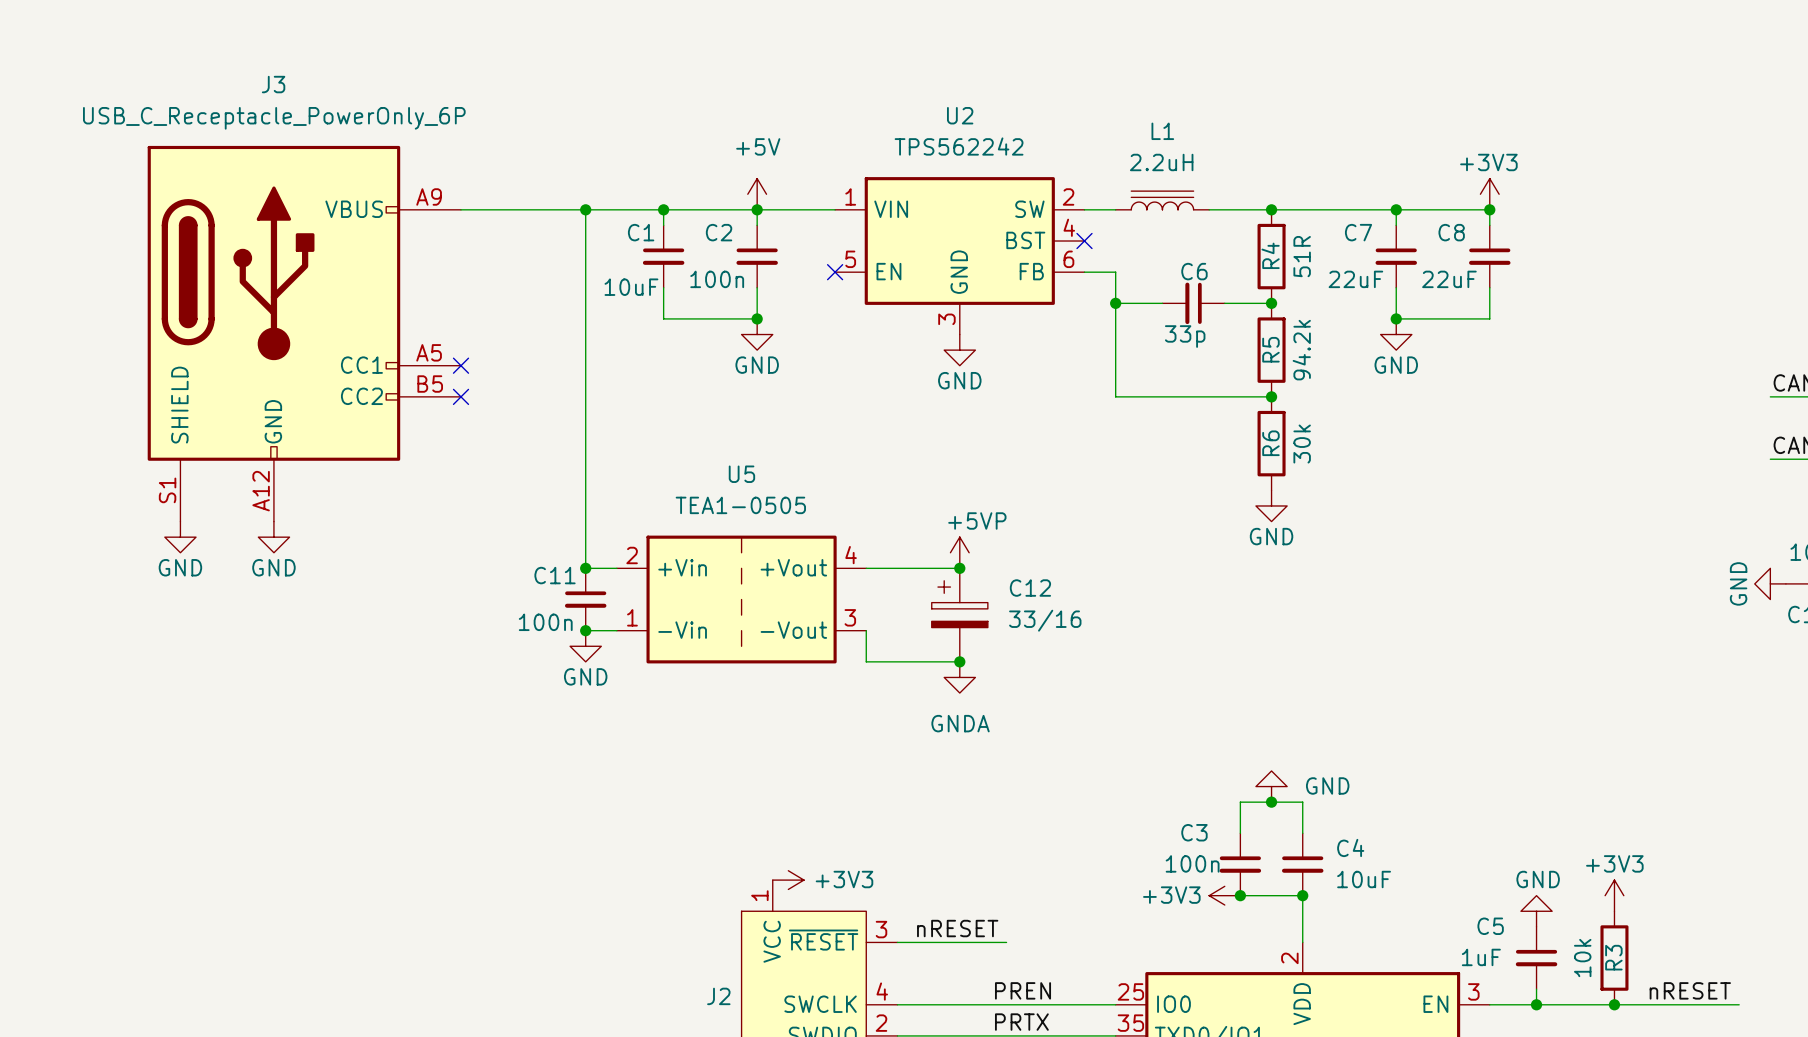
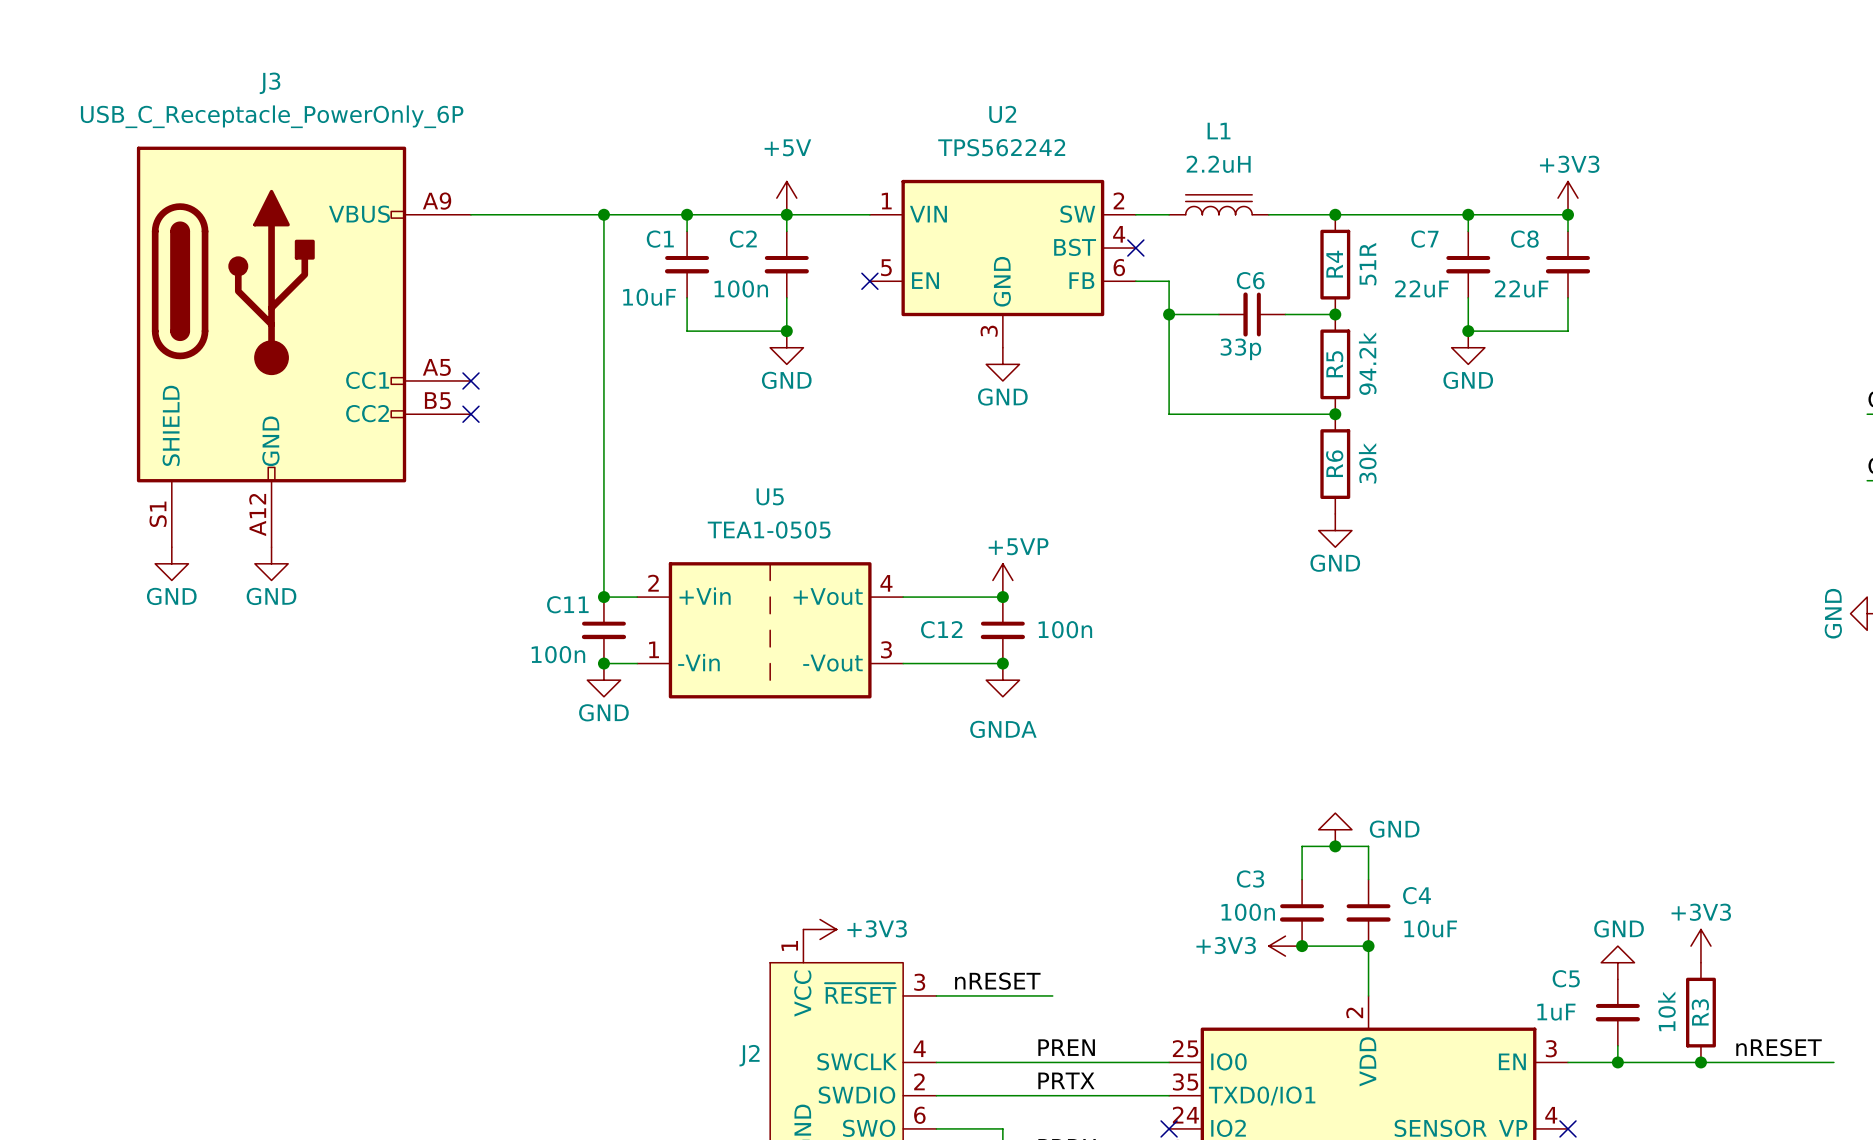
C12 symbol: [931, 568, 988, 662] -> [980, 597, 1025, 664]
C12 name position: C12 (1030, 588) -> C12 (941, 629)
C12 value: 33/16 (1045, 620) -> 100n (1065, 629)
wire: (866, 630) (866, 661) (959, 661) -> (903, 663) (1002, 663)
junction position: (959, 661) -> (1002, 663)
power symbol position: GNDA (959, 677) -> GNDA (1002, 680)

